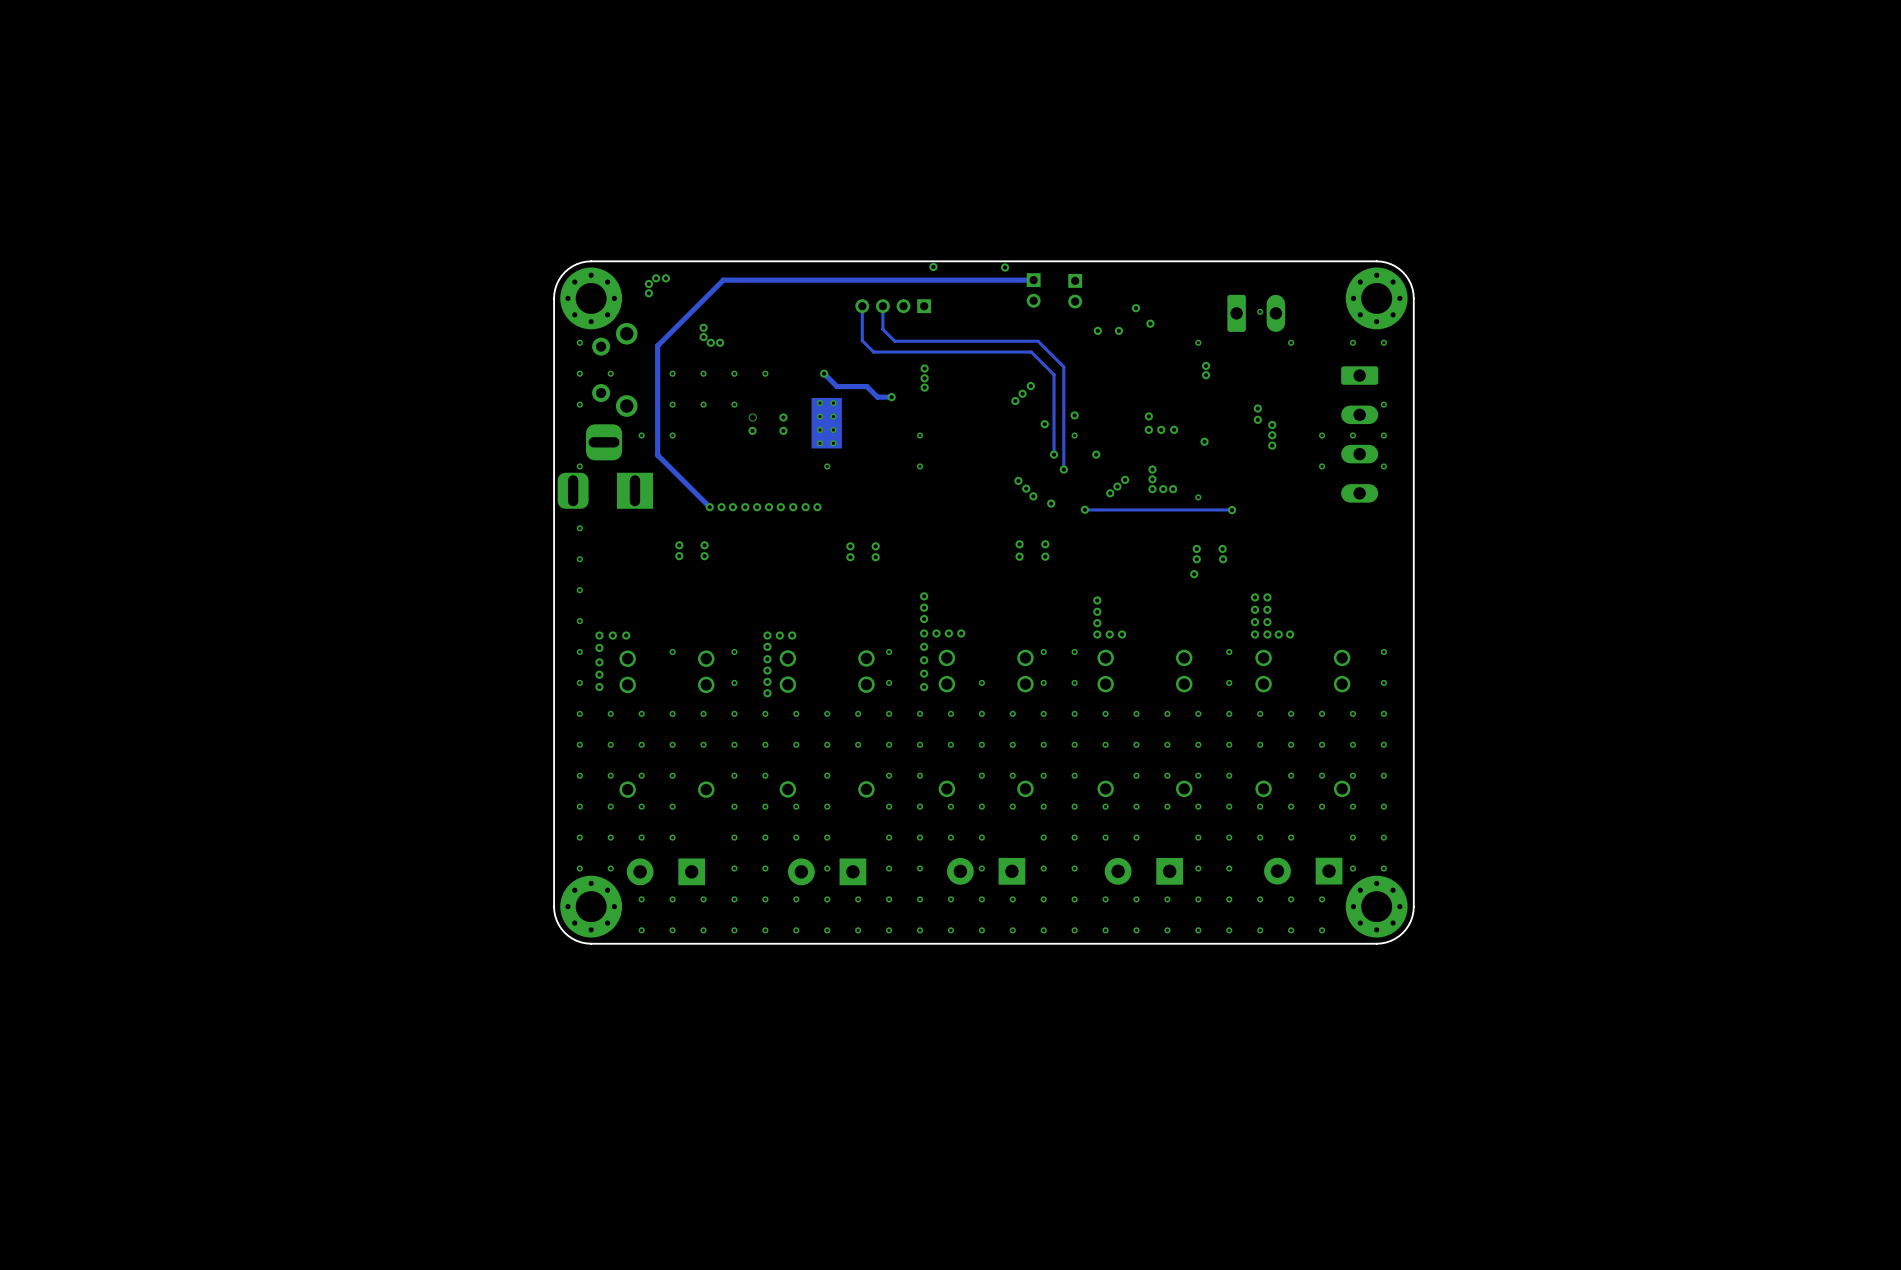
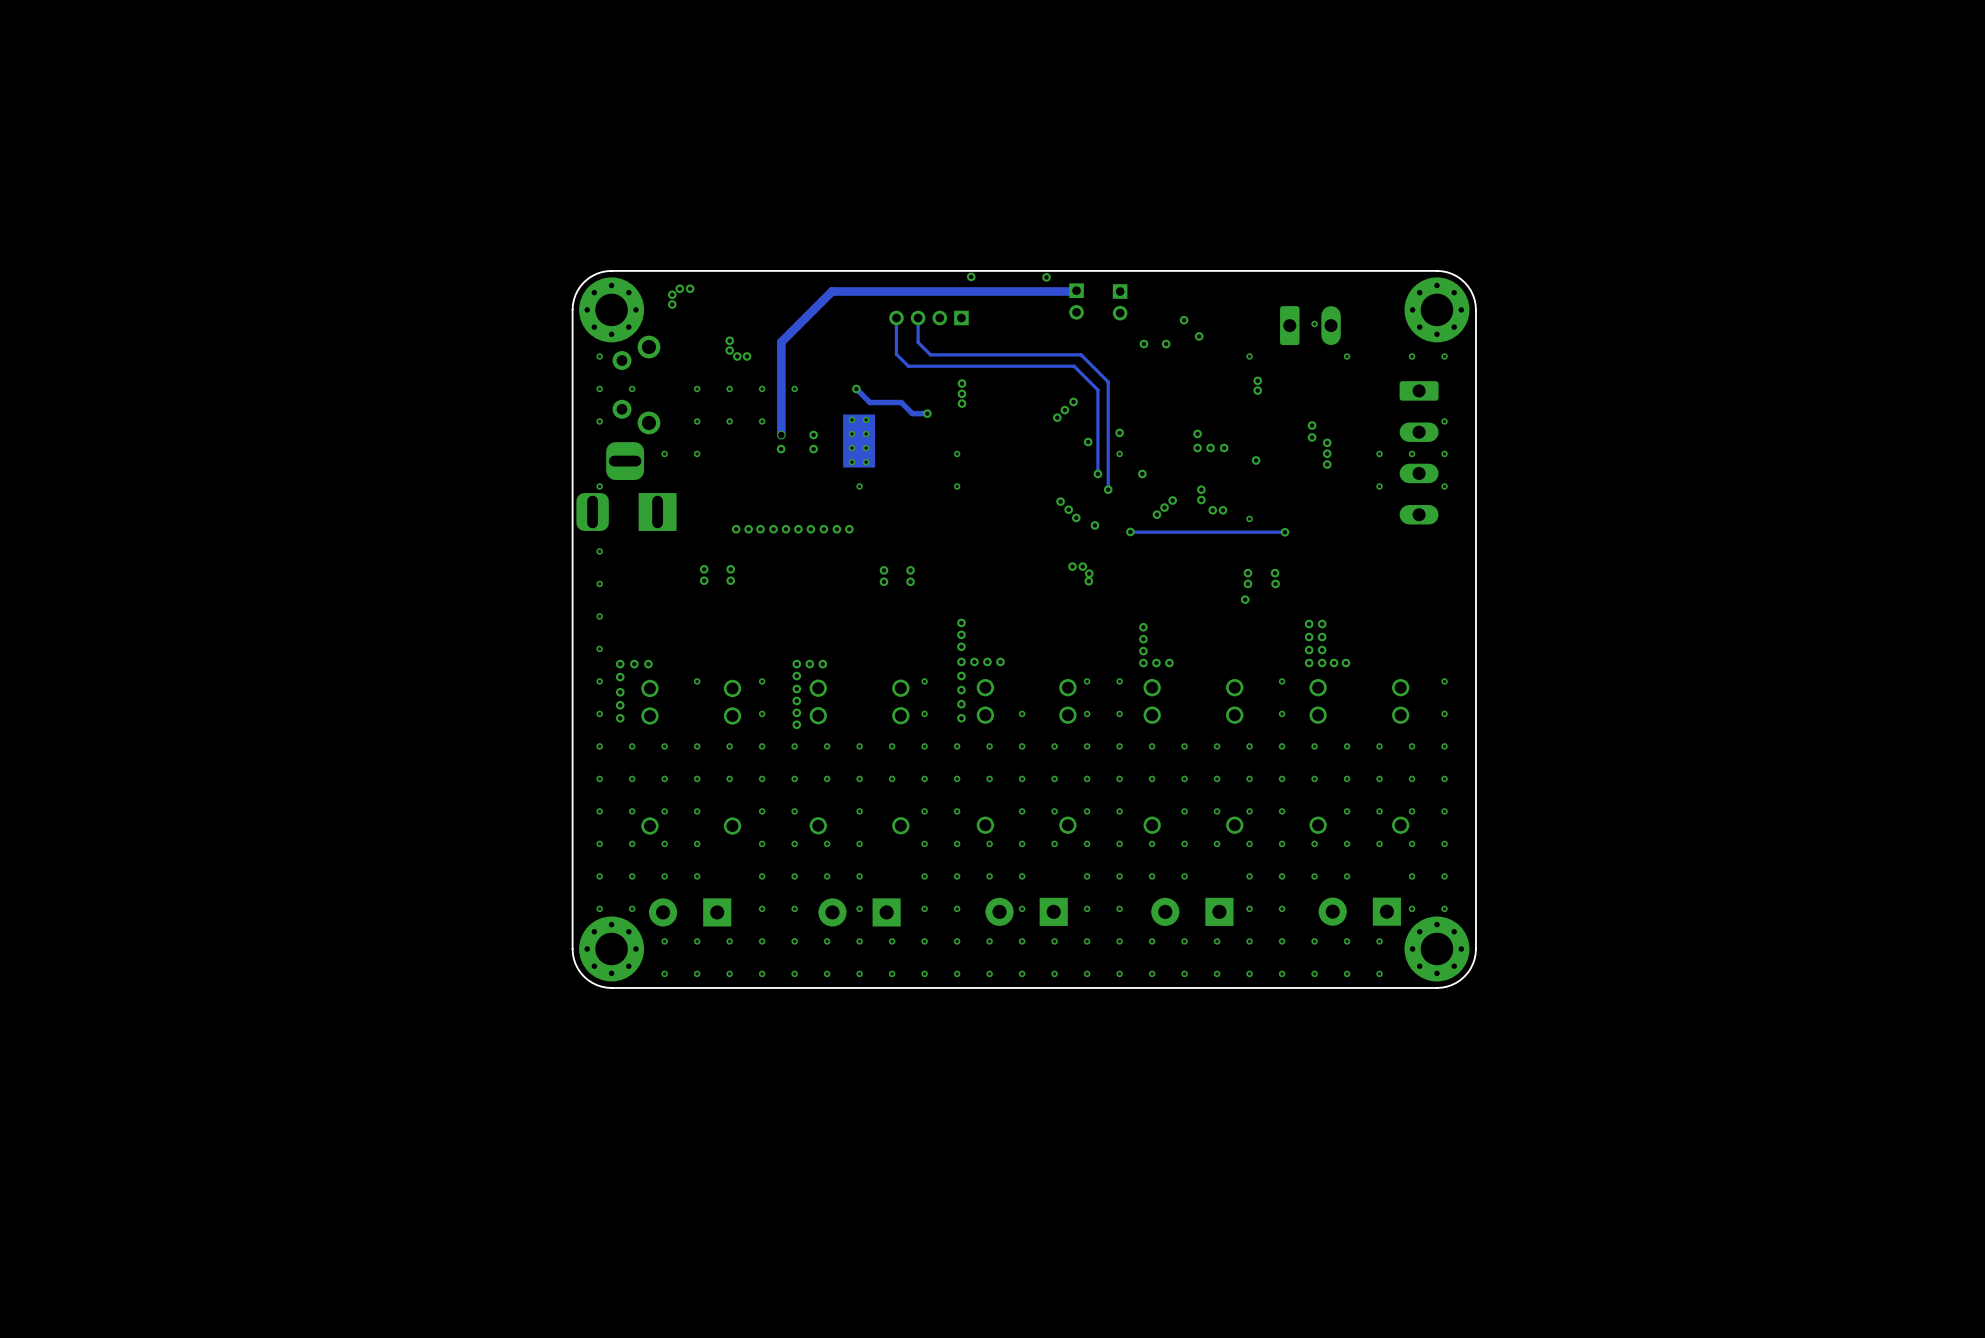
track: (1033, 280) (723, 280) (657, 345) (657, 455) (709, 507) -> (1076, 290) (832, 291) (781, 342) (781, 435)
via: (1152, 489) -> none
via: none -> (1072, 566)
via: none -> (1082, 566)
via: (1019, 544) -> none
via: (1045, 544) -> none
via: none -> (1089, 573)
via: (1019, 556) -> none

